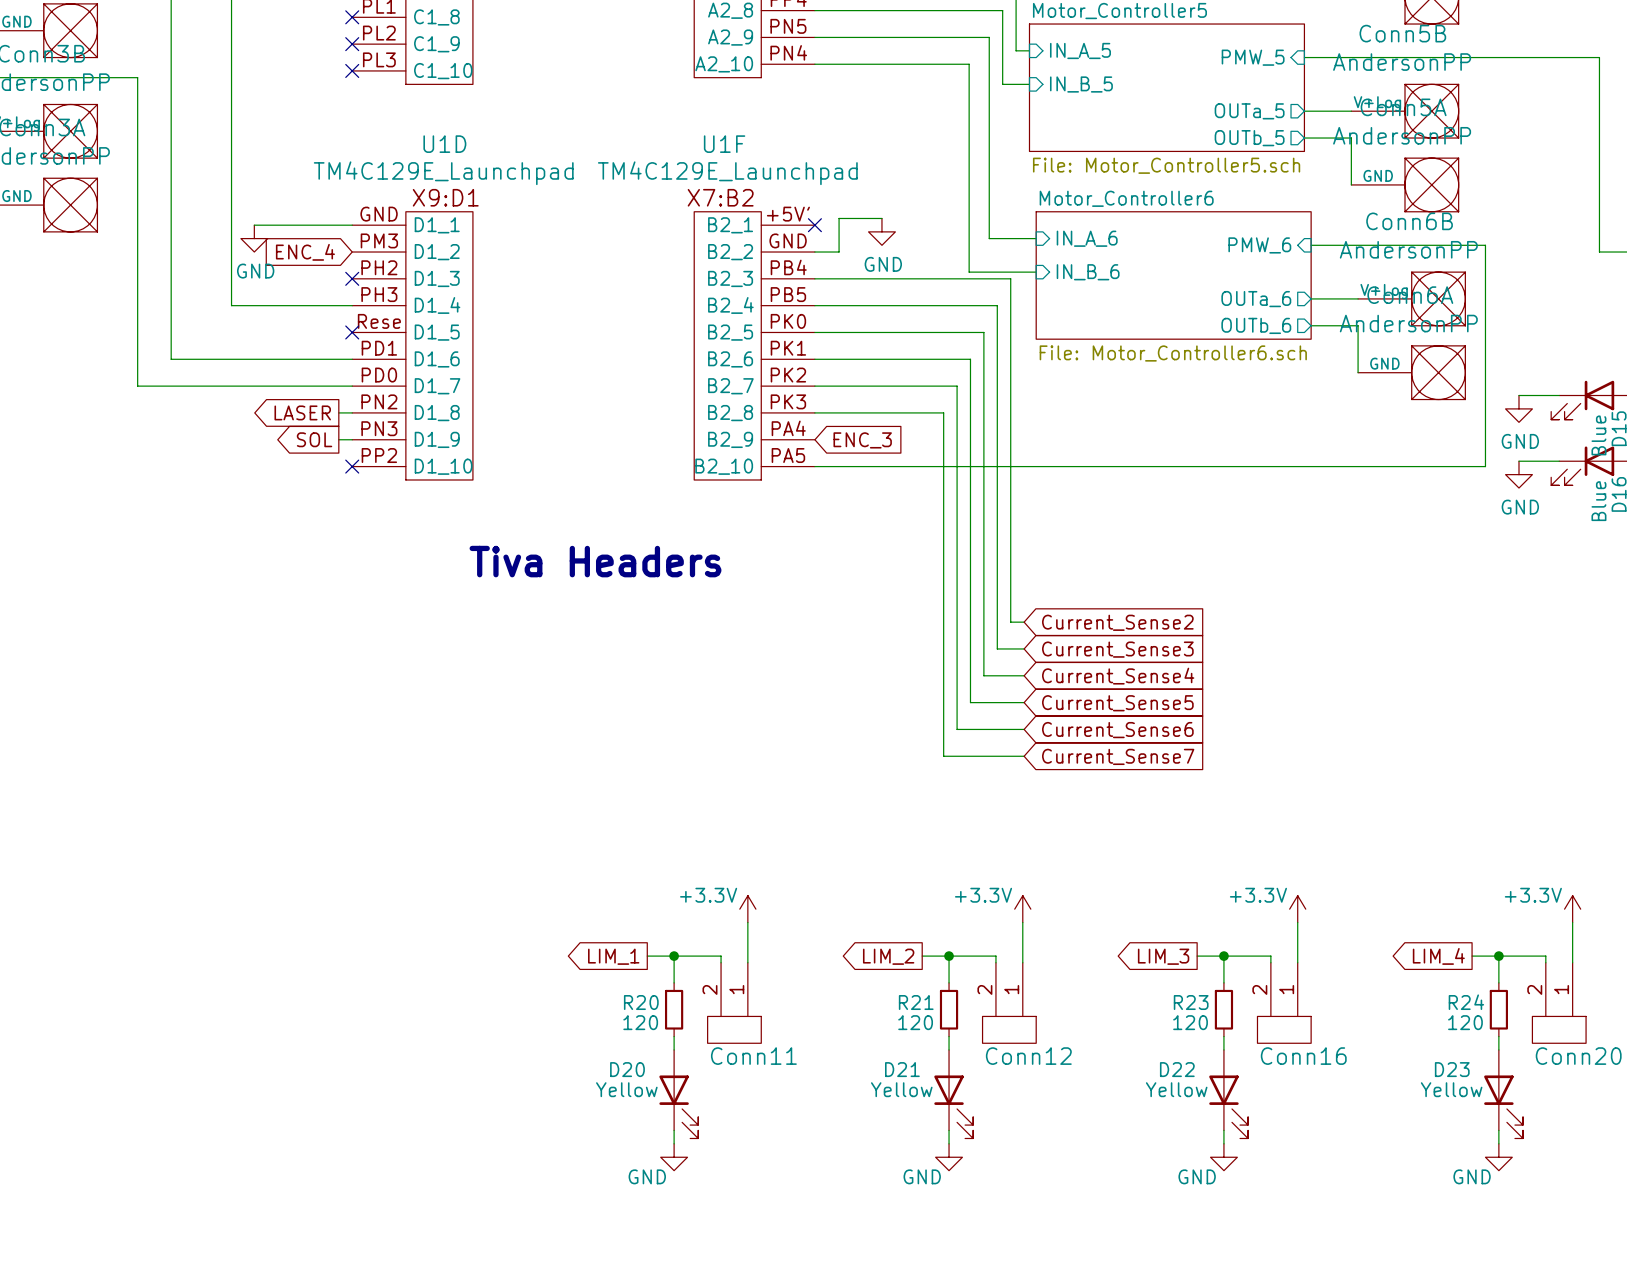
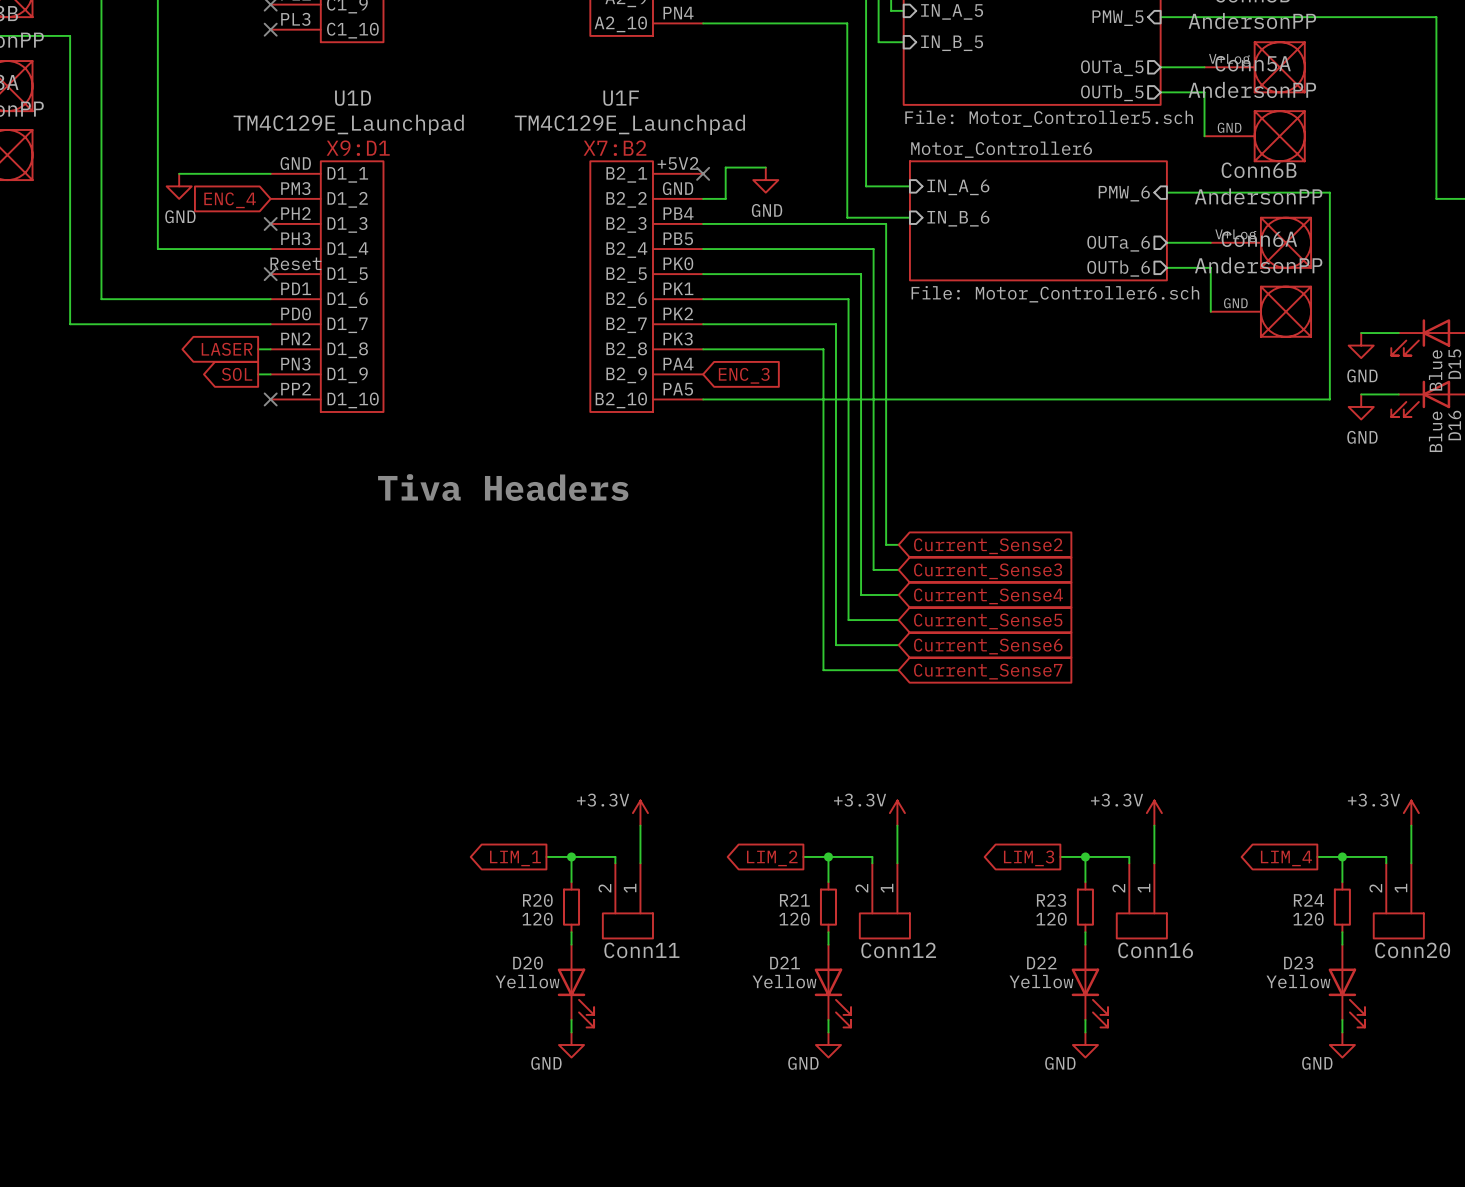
U1F pin number: +5V' (788, 214) -> +5V2 (678, 163)
U1D pin number: Rese (379, 321) -> Reset (295, 263)

